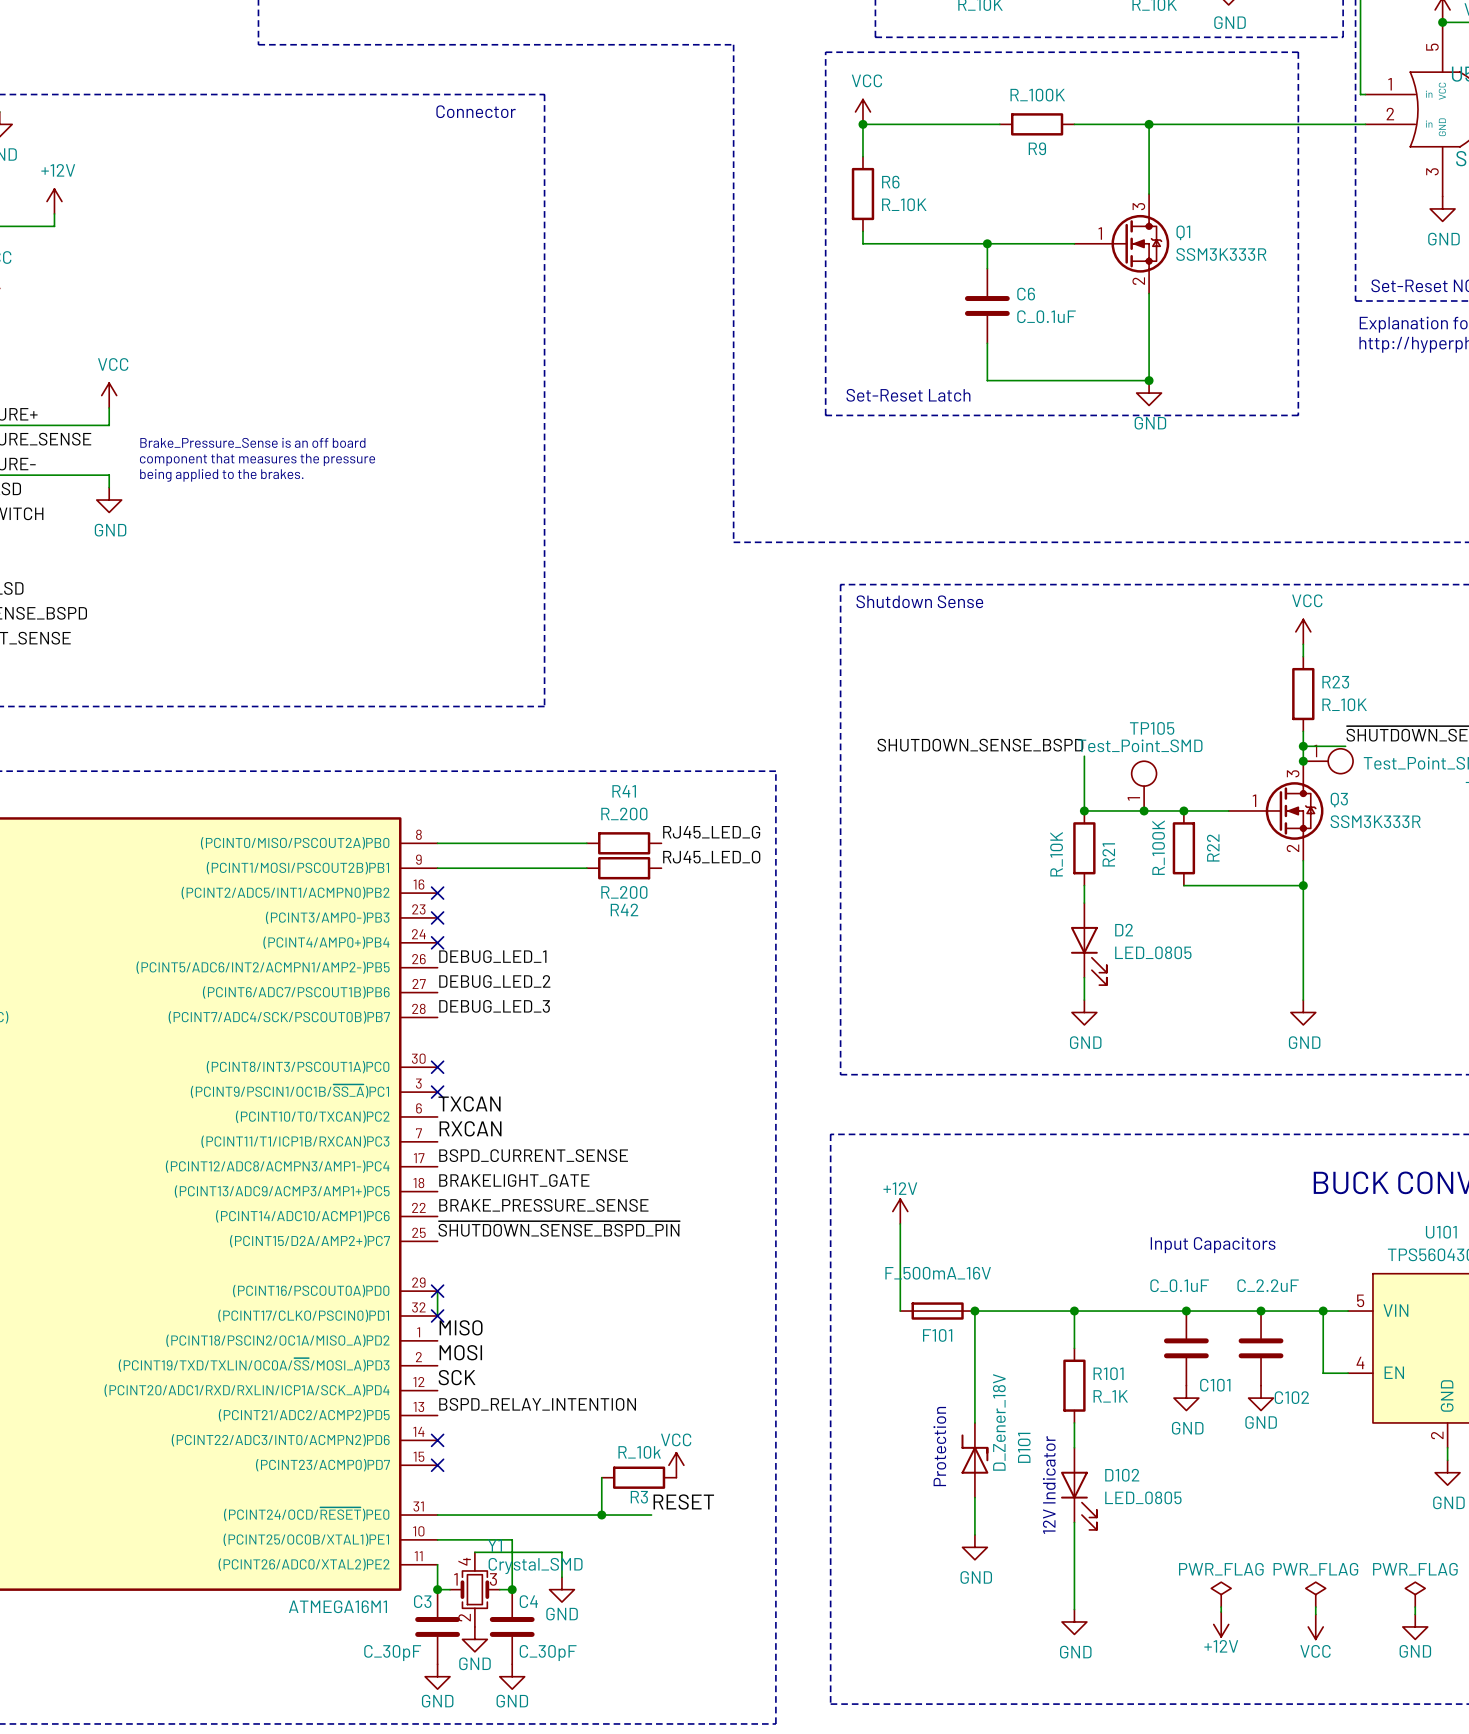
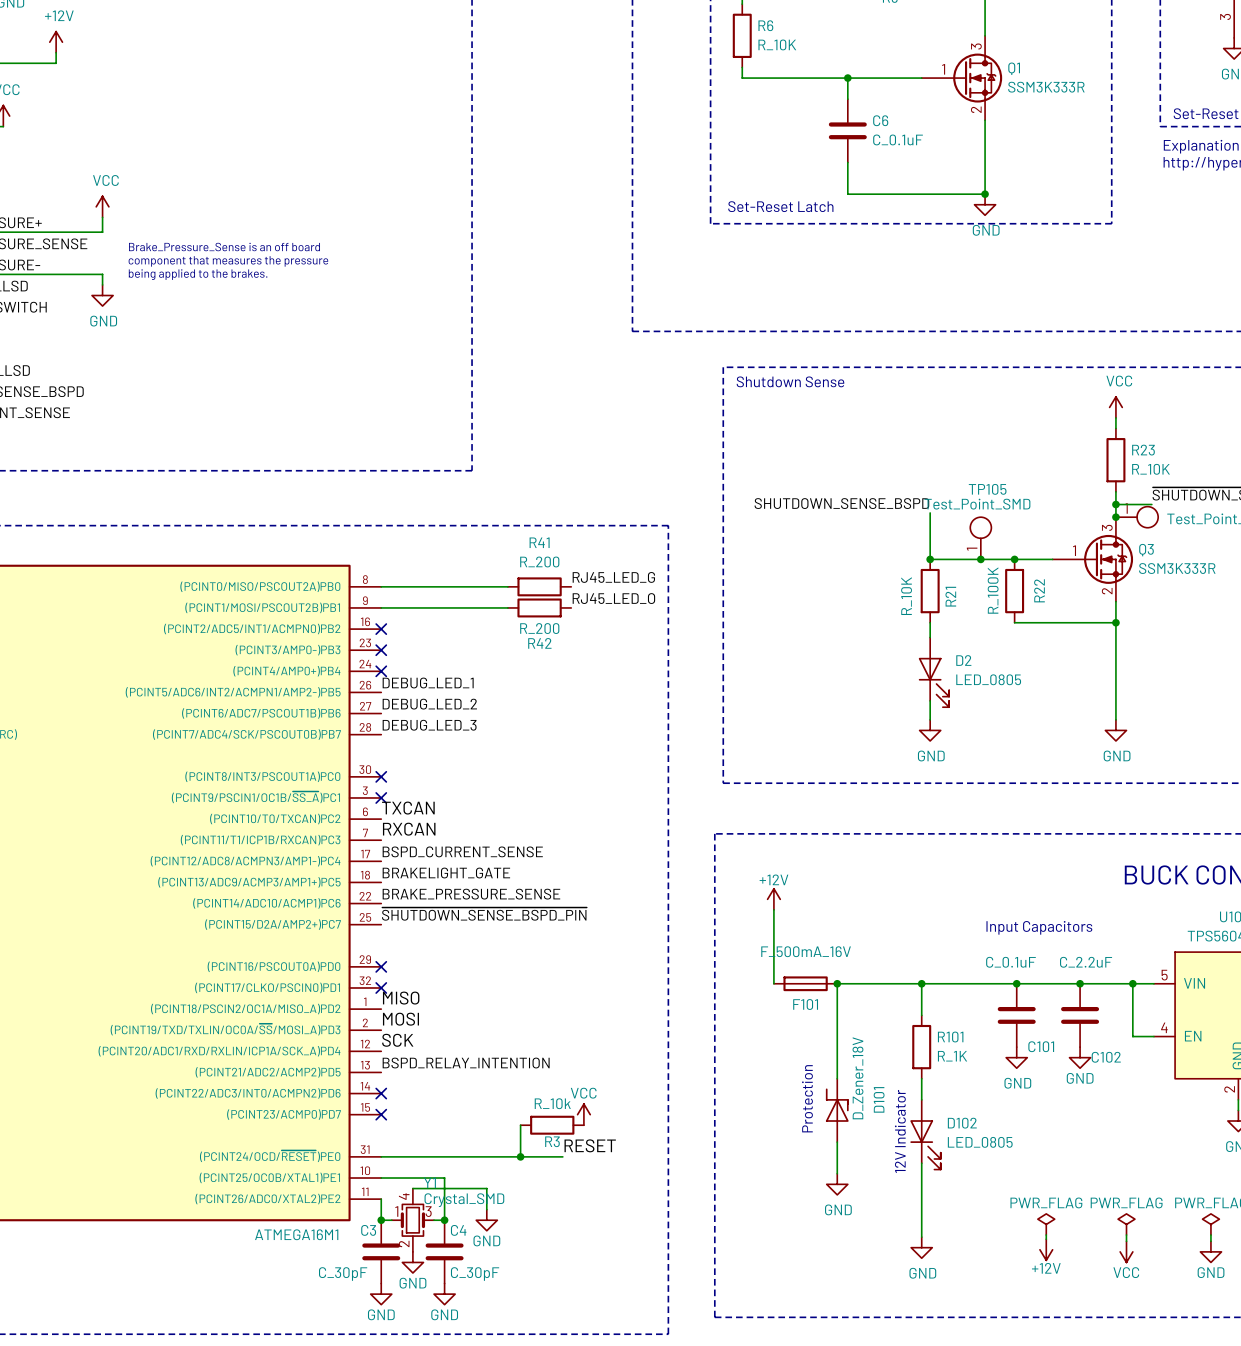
wire: (437, 1291) (437, 1315) -> none

